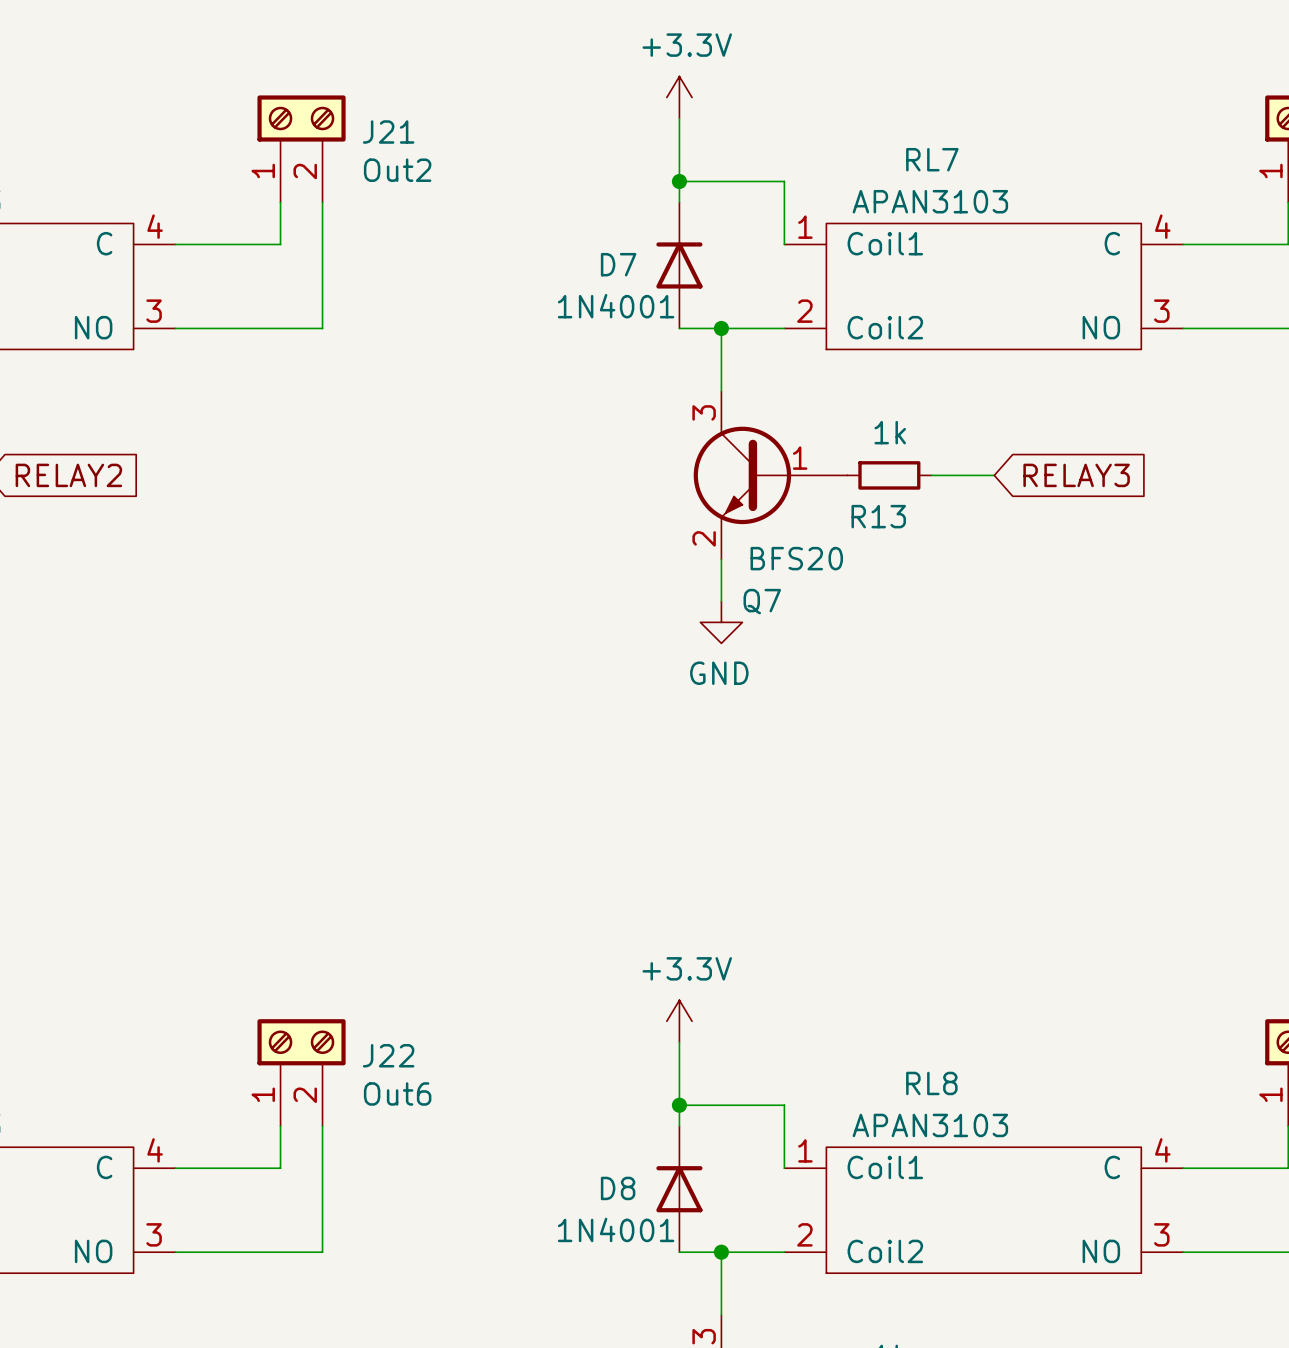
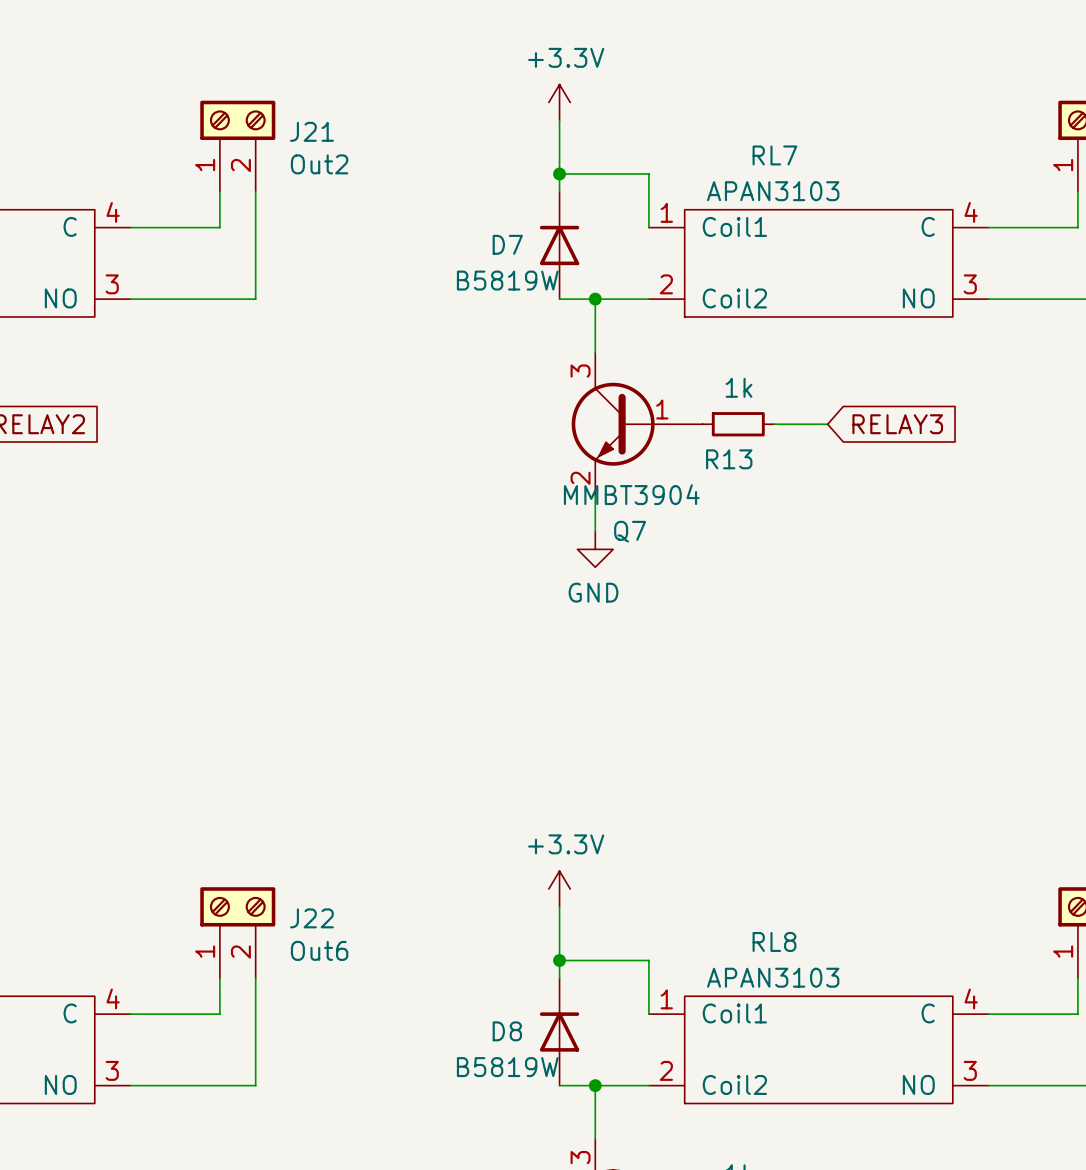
D7 value: 1N4001 (616, 306) -> B5819W (507, 280)
Q7 value: BFS20 (796, 558) -> MMBT3904 (631, 494)
D8 value: 1N4001 (616, 1229) -> B5819W (507, 1067)

